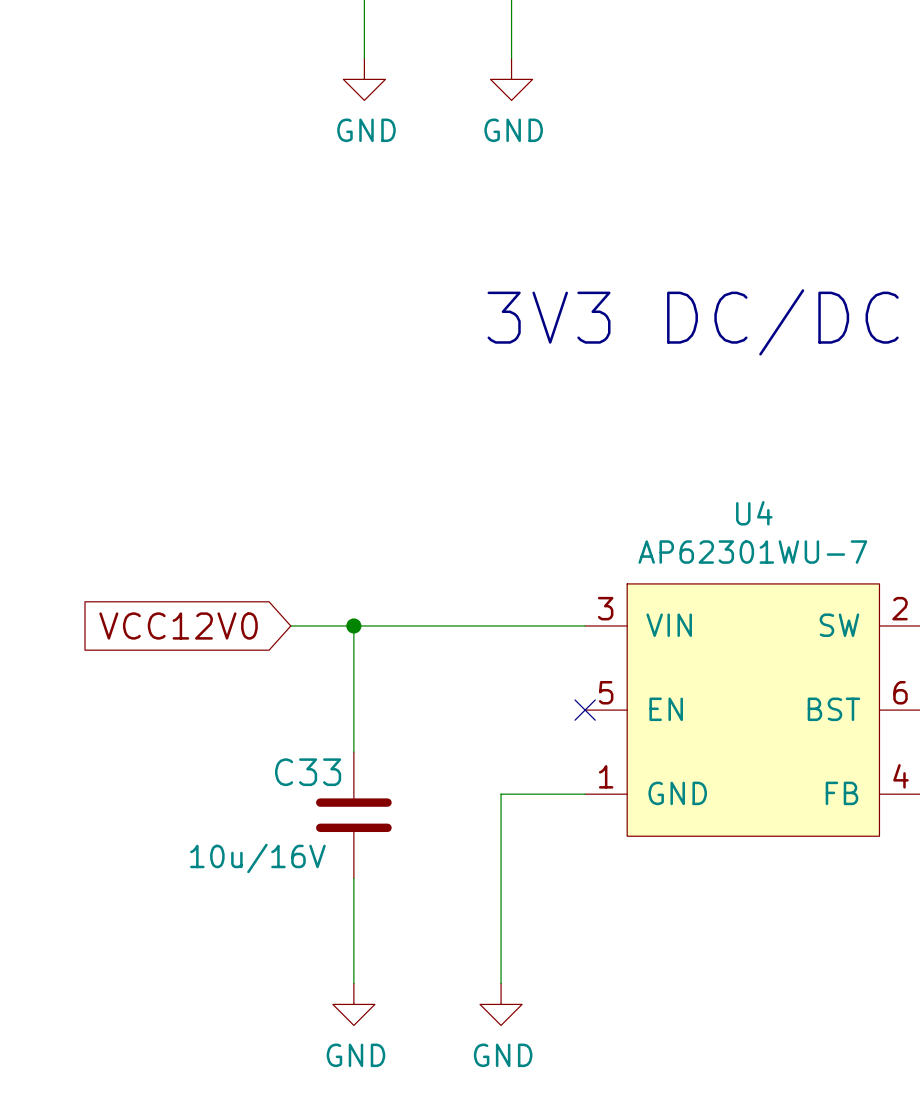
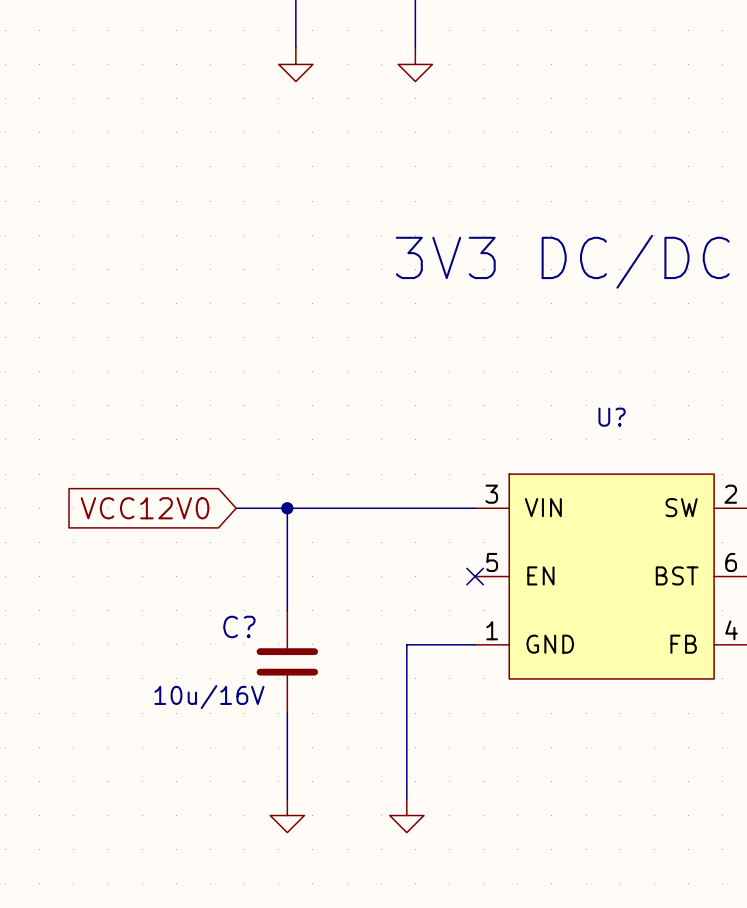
power symbol text: GND (366, 130) -> none
power symbol text: GND (513, 130) -> none
U4 name: U4 (754, 513) -> U? (612, 417)
U4 value: AP62301WU-7 (752, 552) -> none
C33 name: C33 (308, 772) -> C? (239, 626)
power symbol text: GND (355, 1055) -> none
power symbol text: GND (503, 1055) -> none

